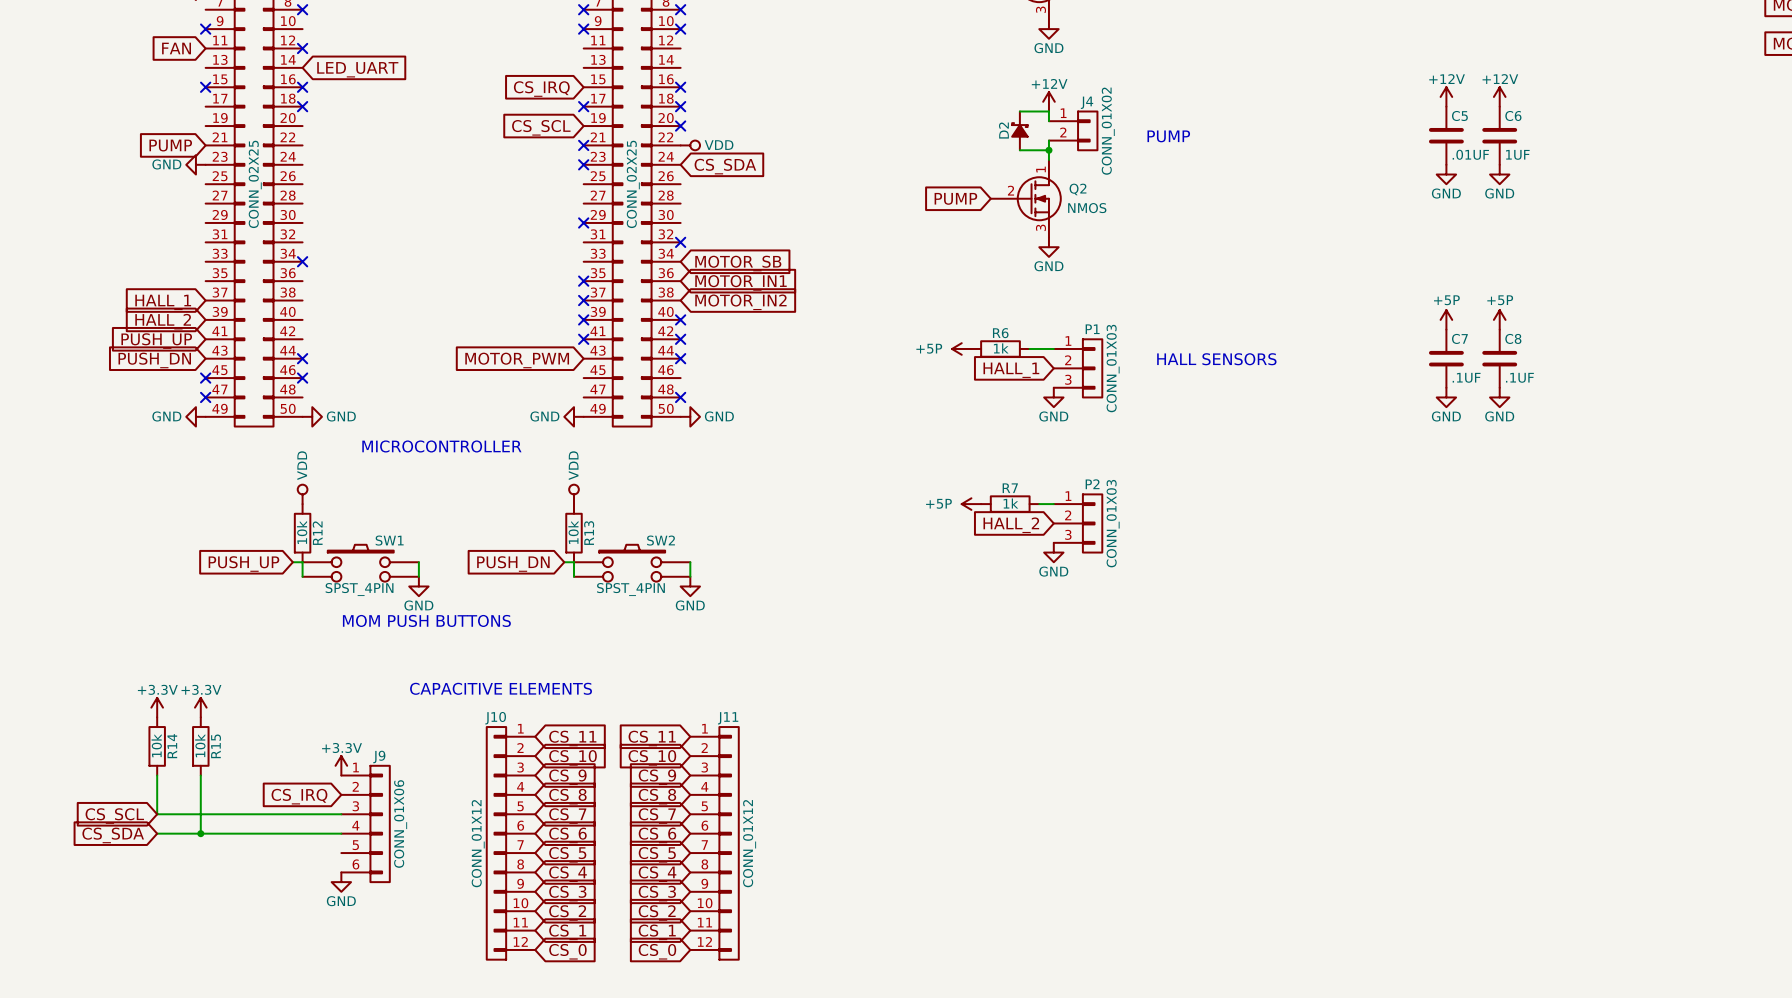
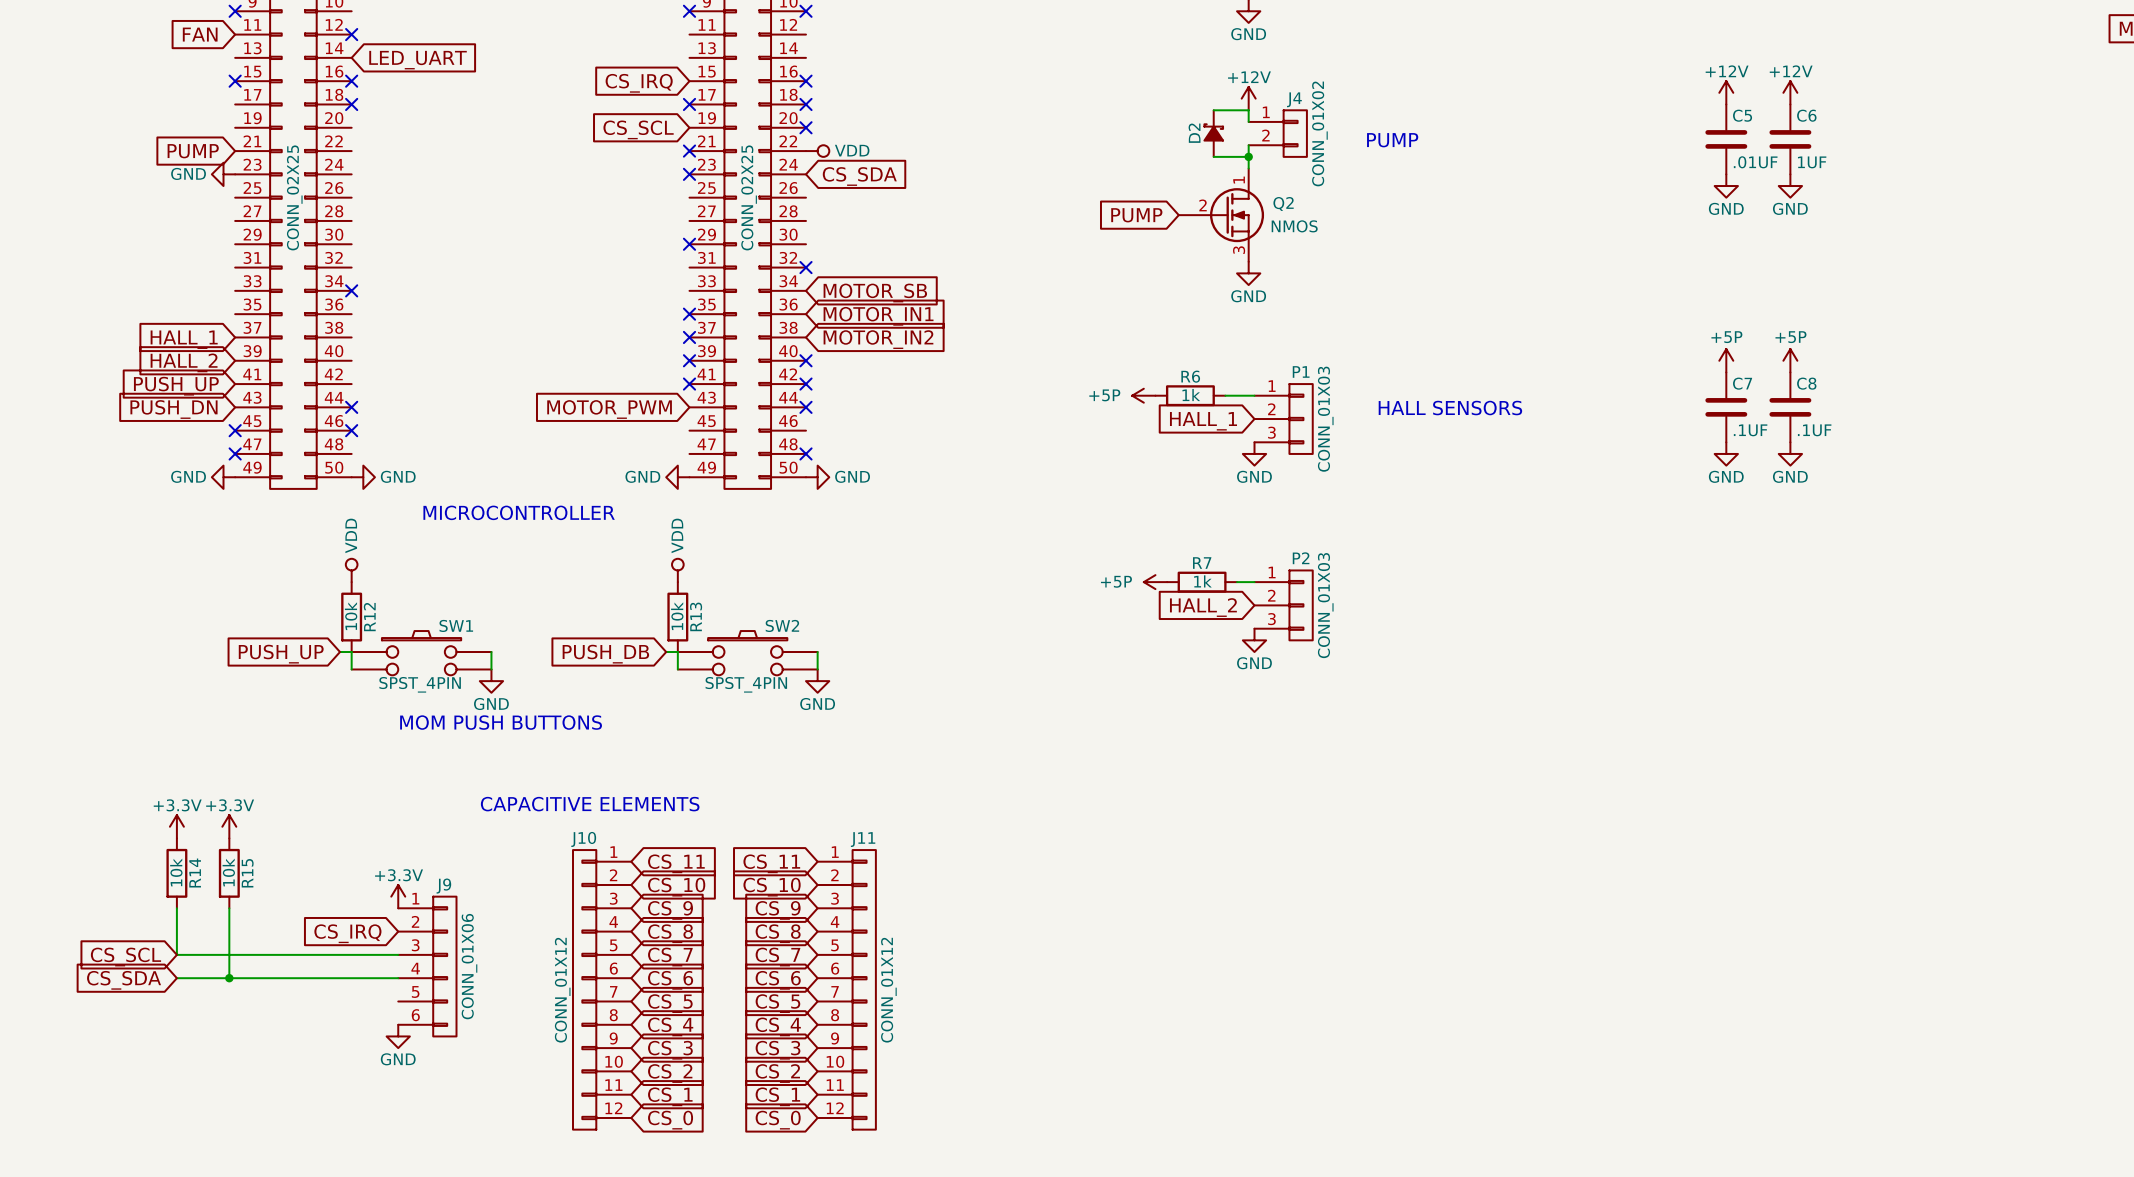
global label: PUSH_DN (513, 564) -> PUSH_DB (605, 654)

